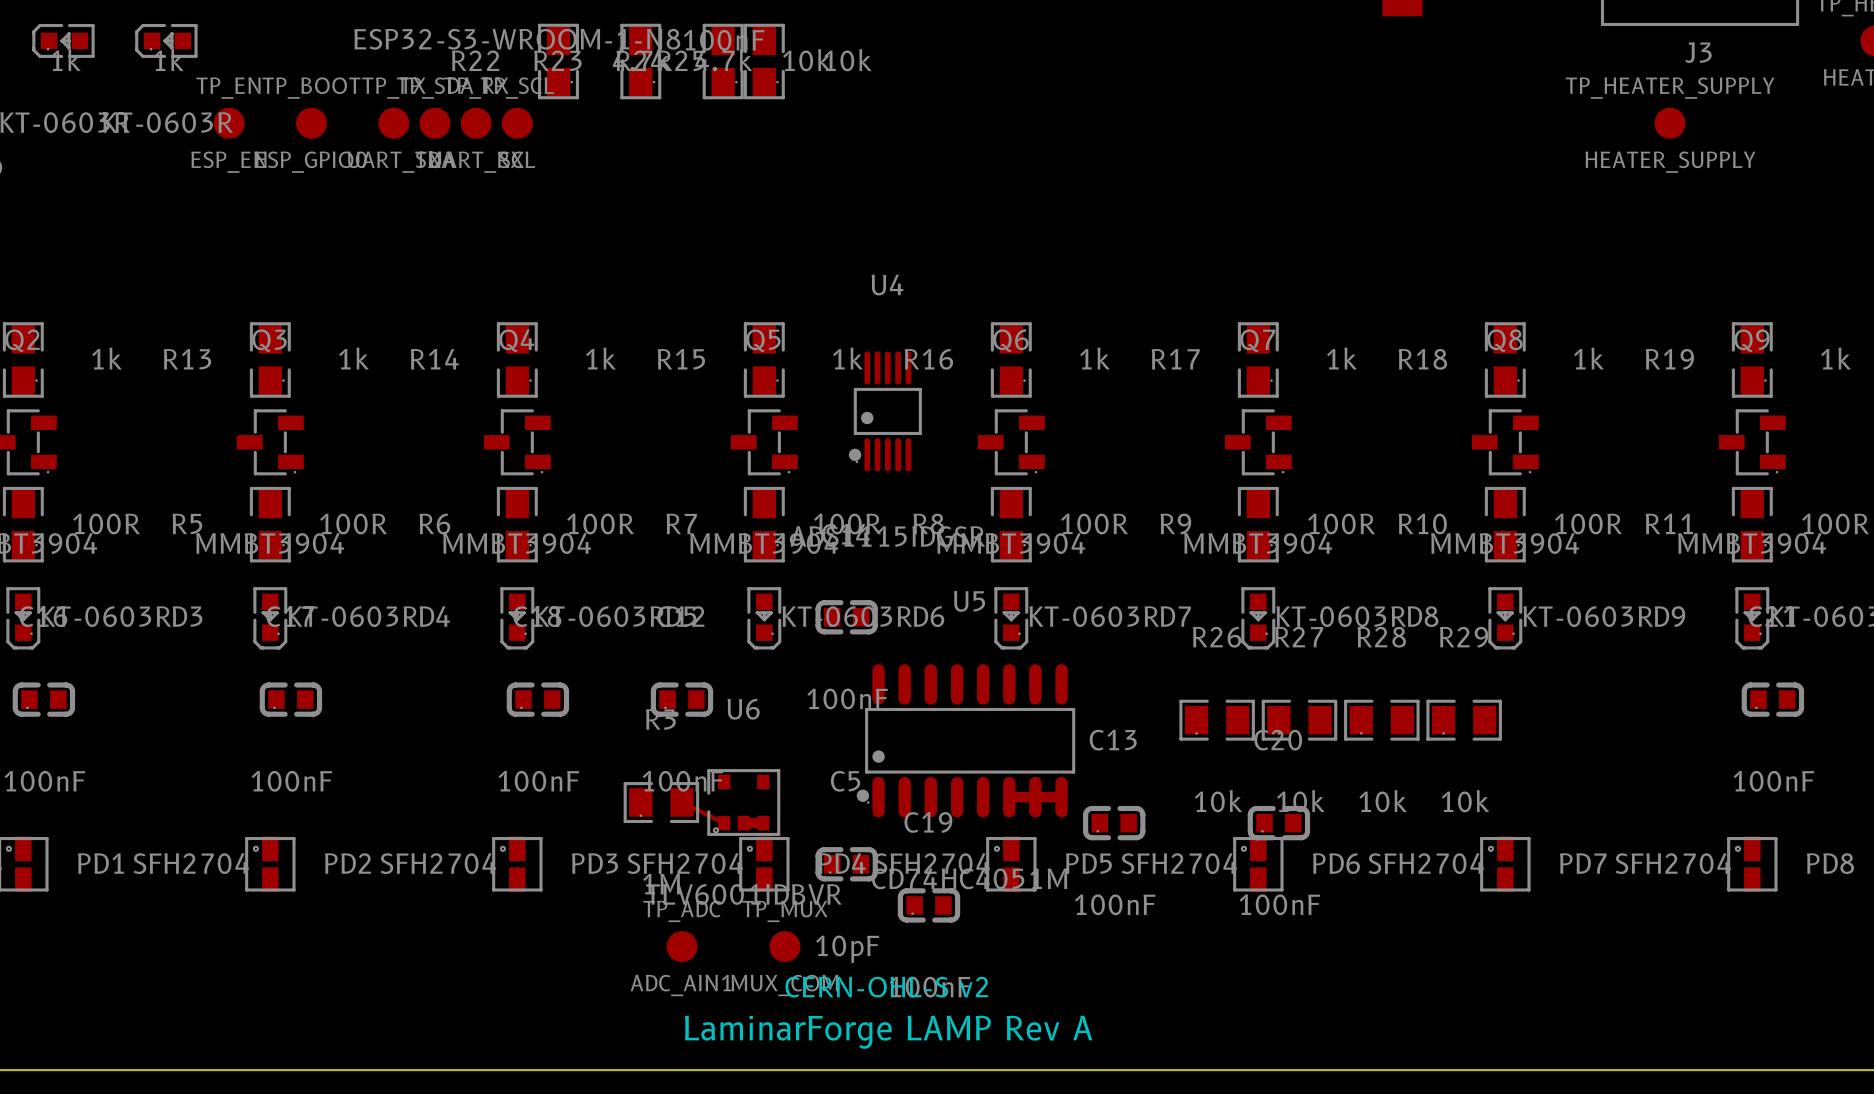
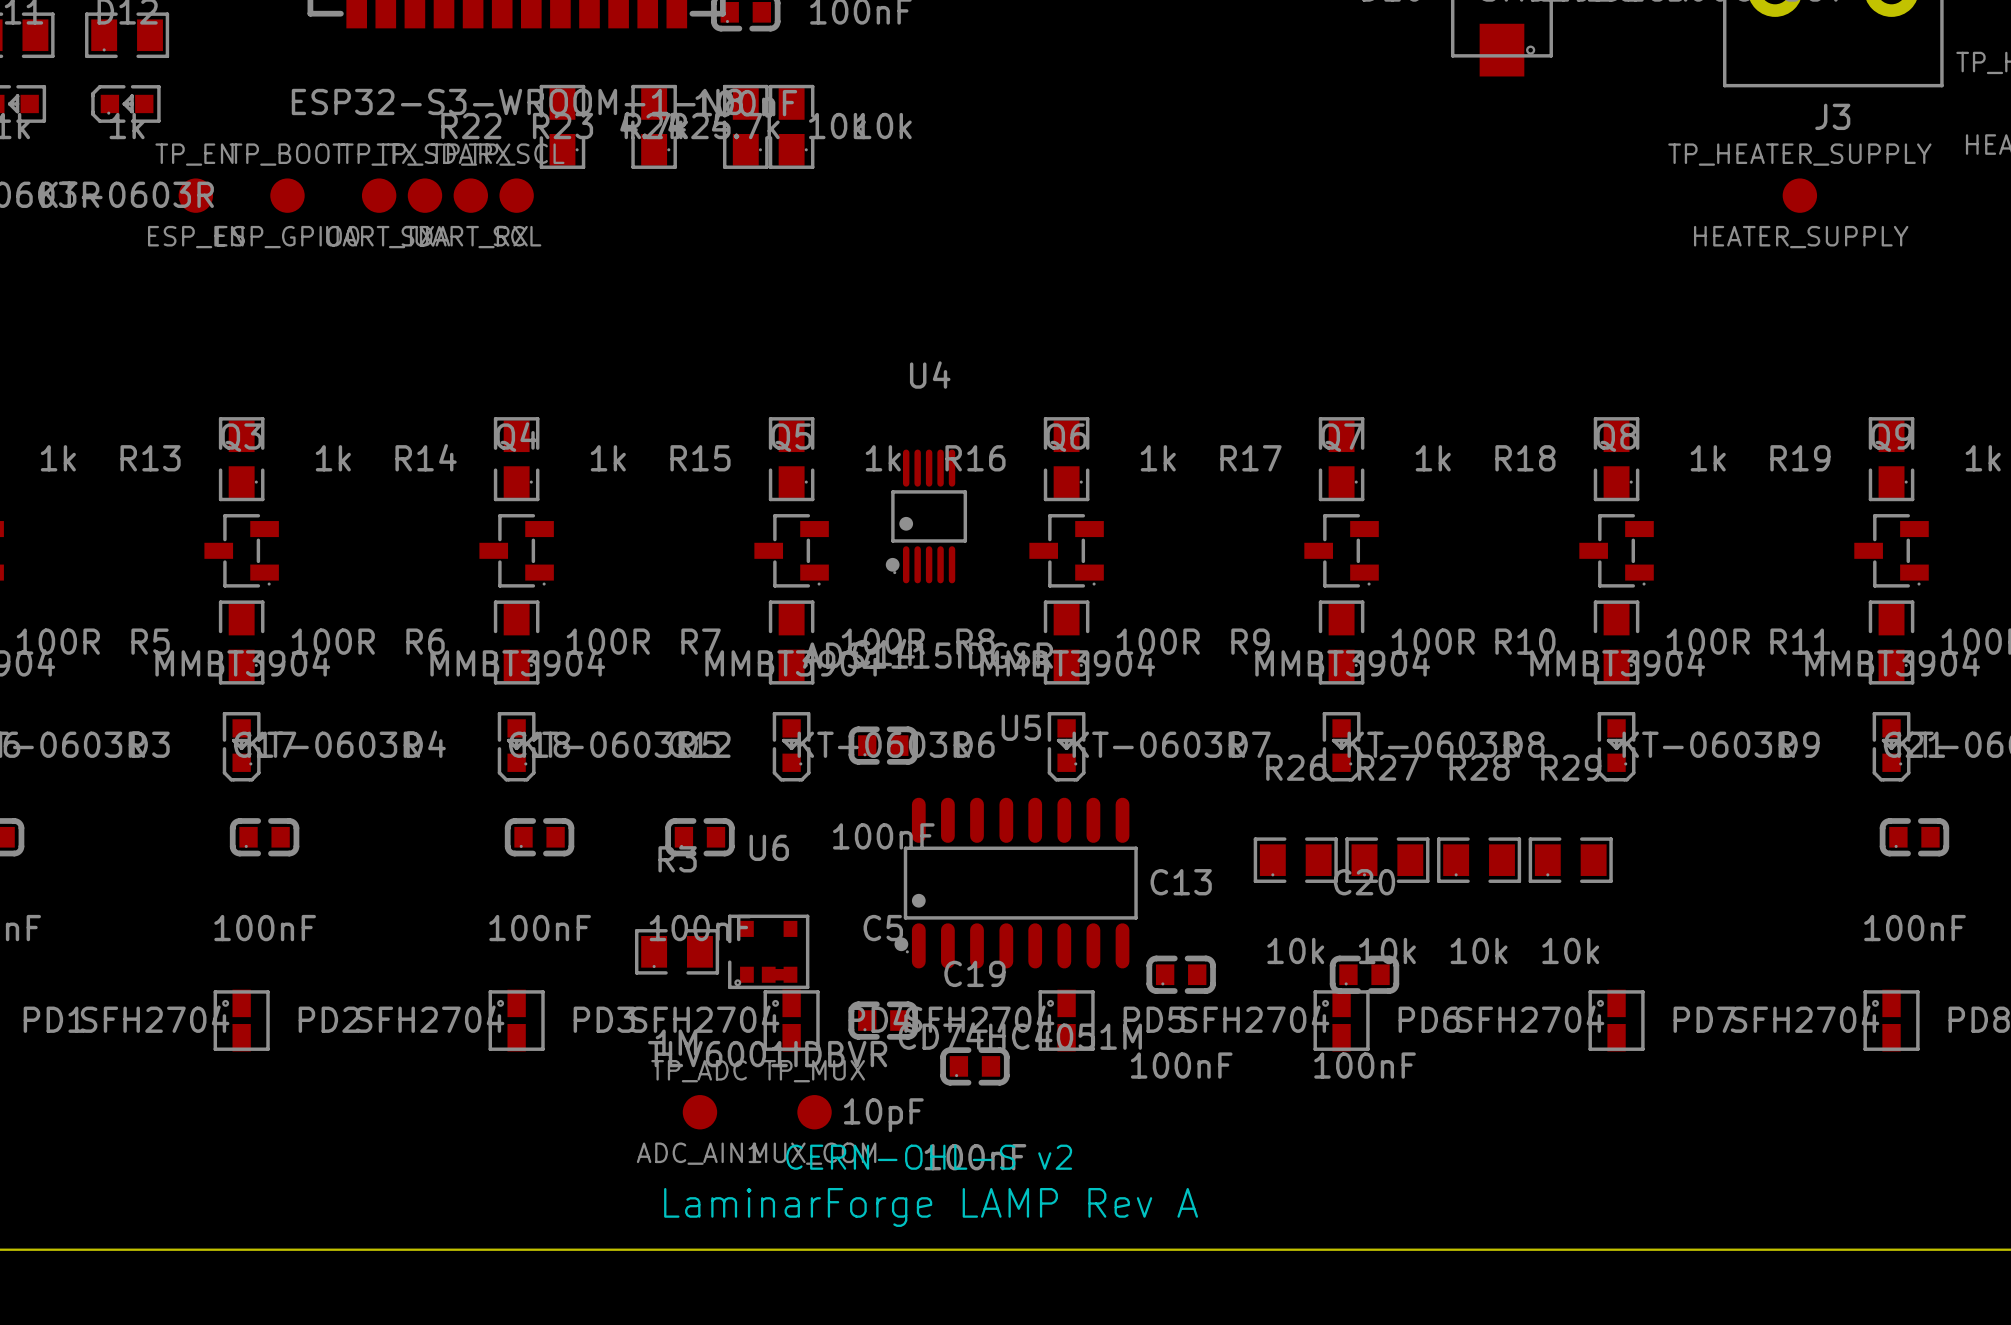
track: (1009, 797) (1061, 797) -> none
track: (681, 802) (724, 823) -> none

